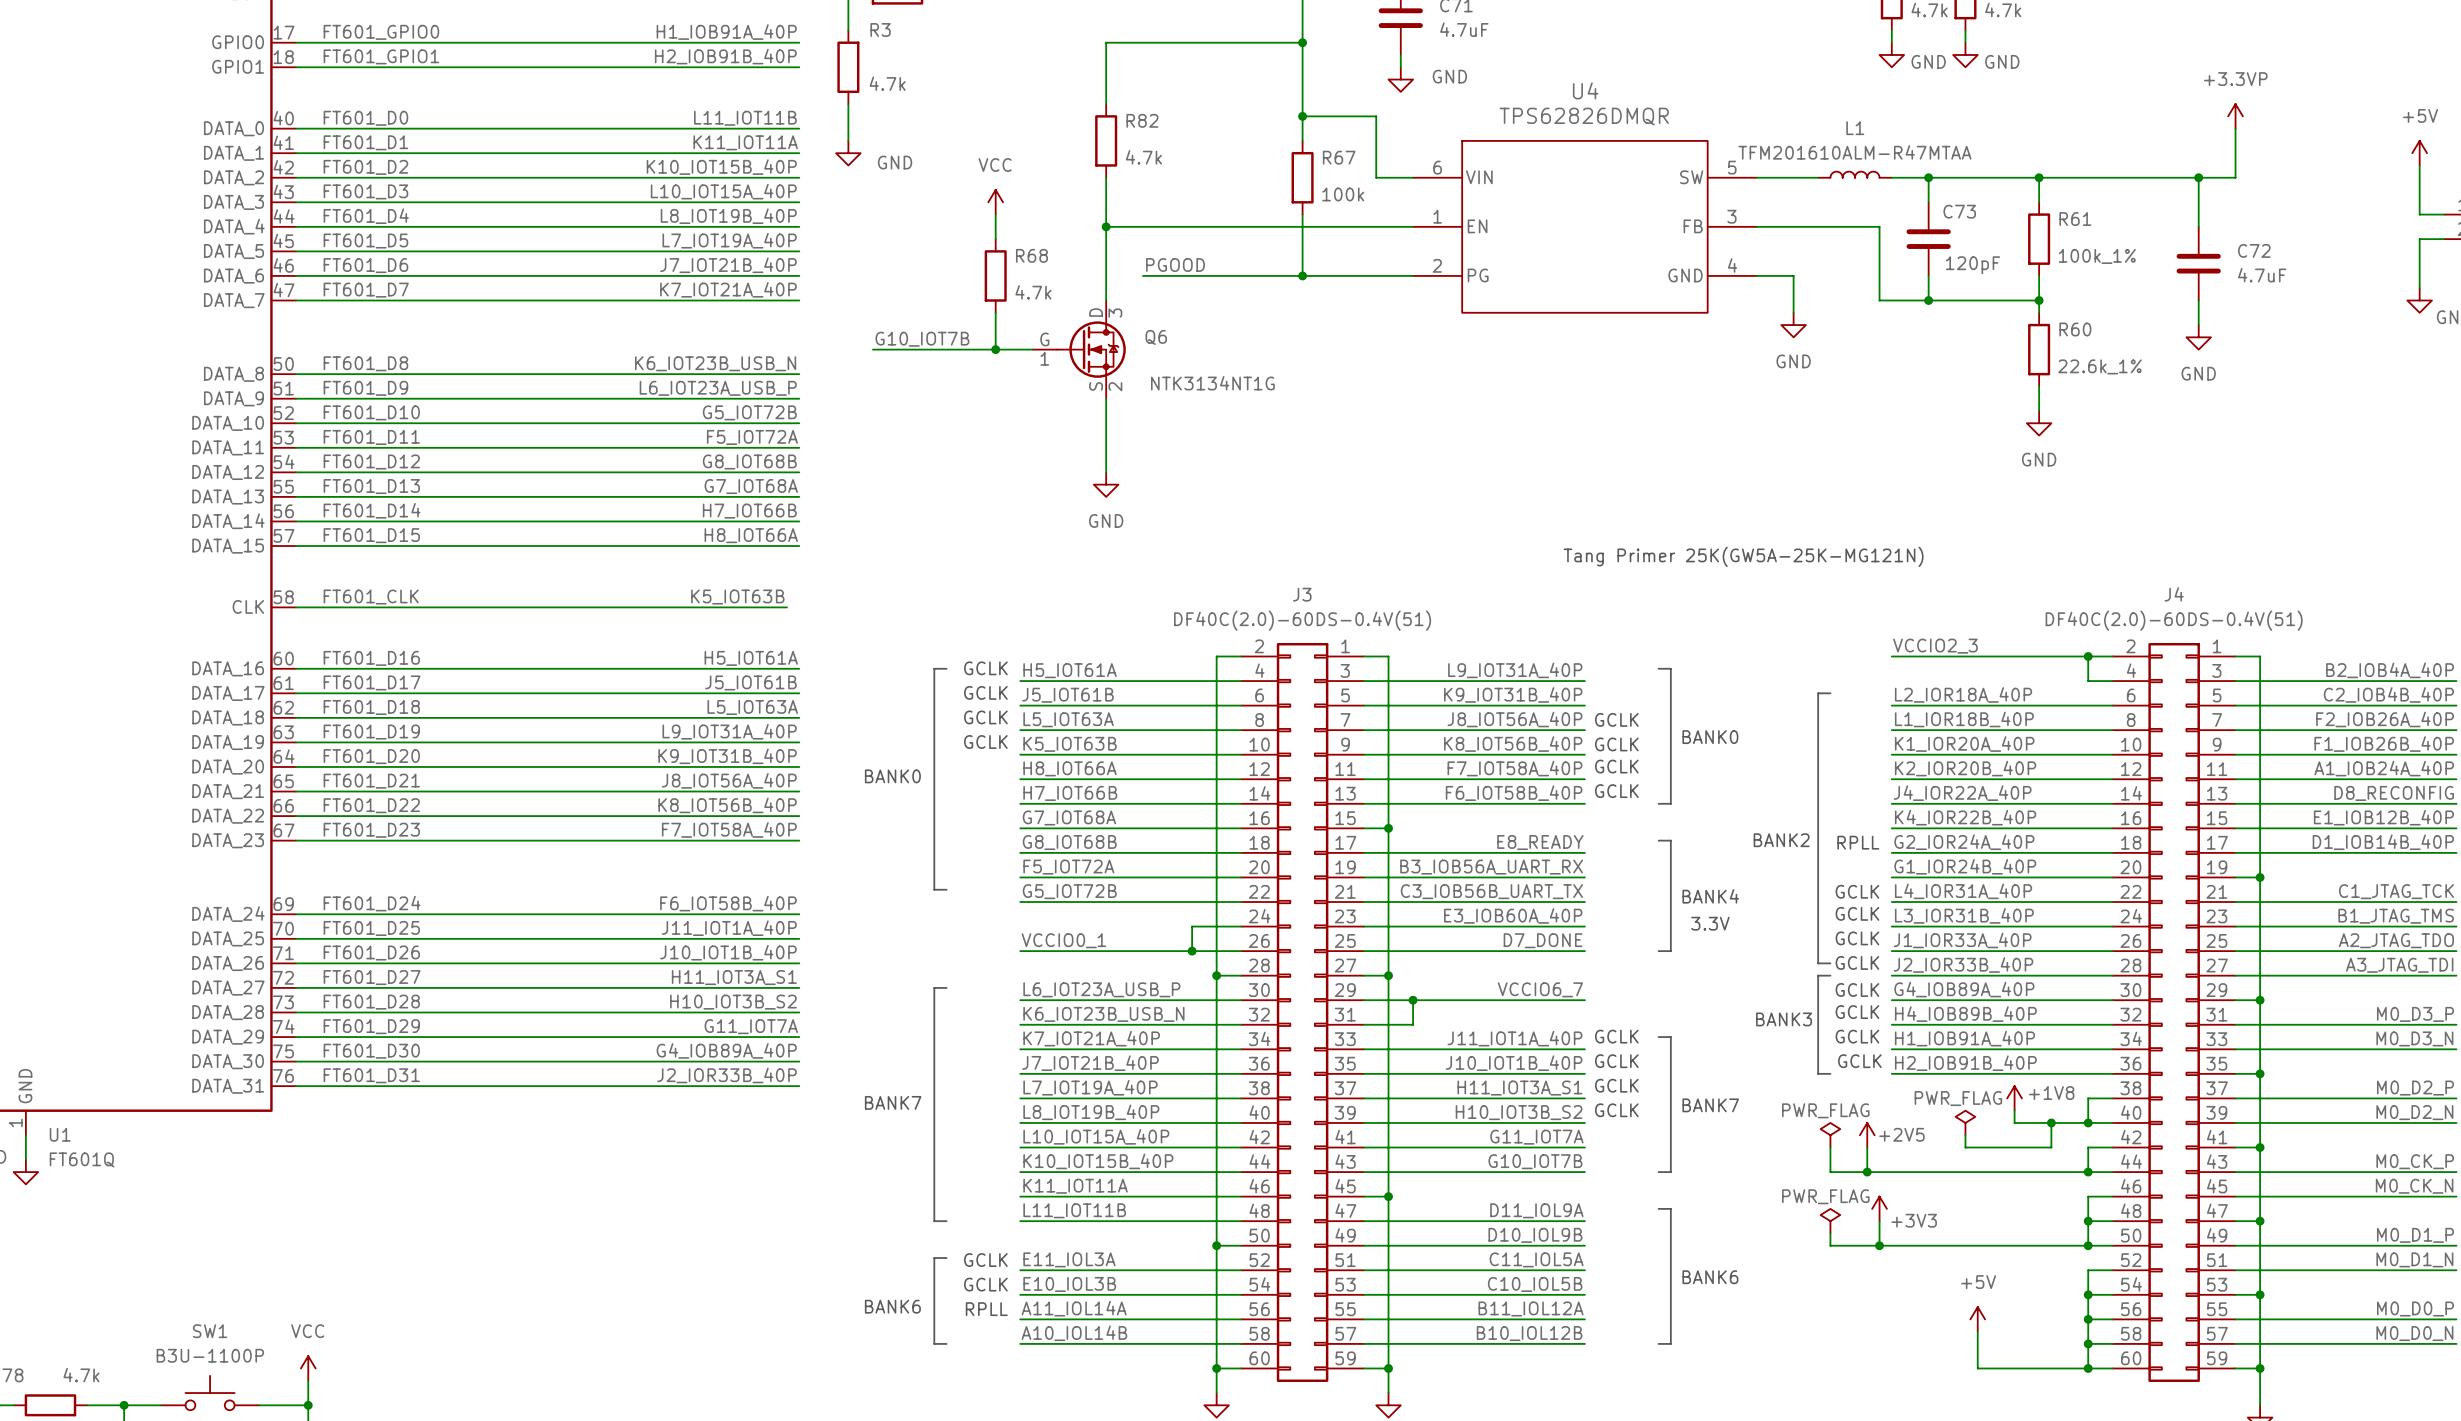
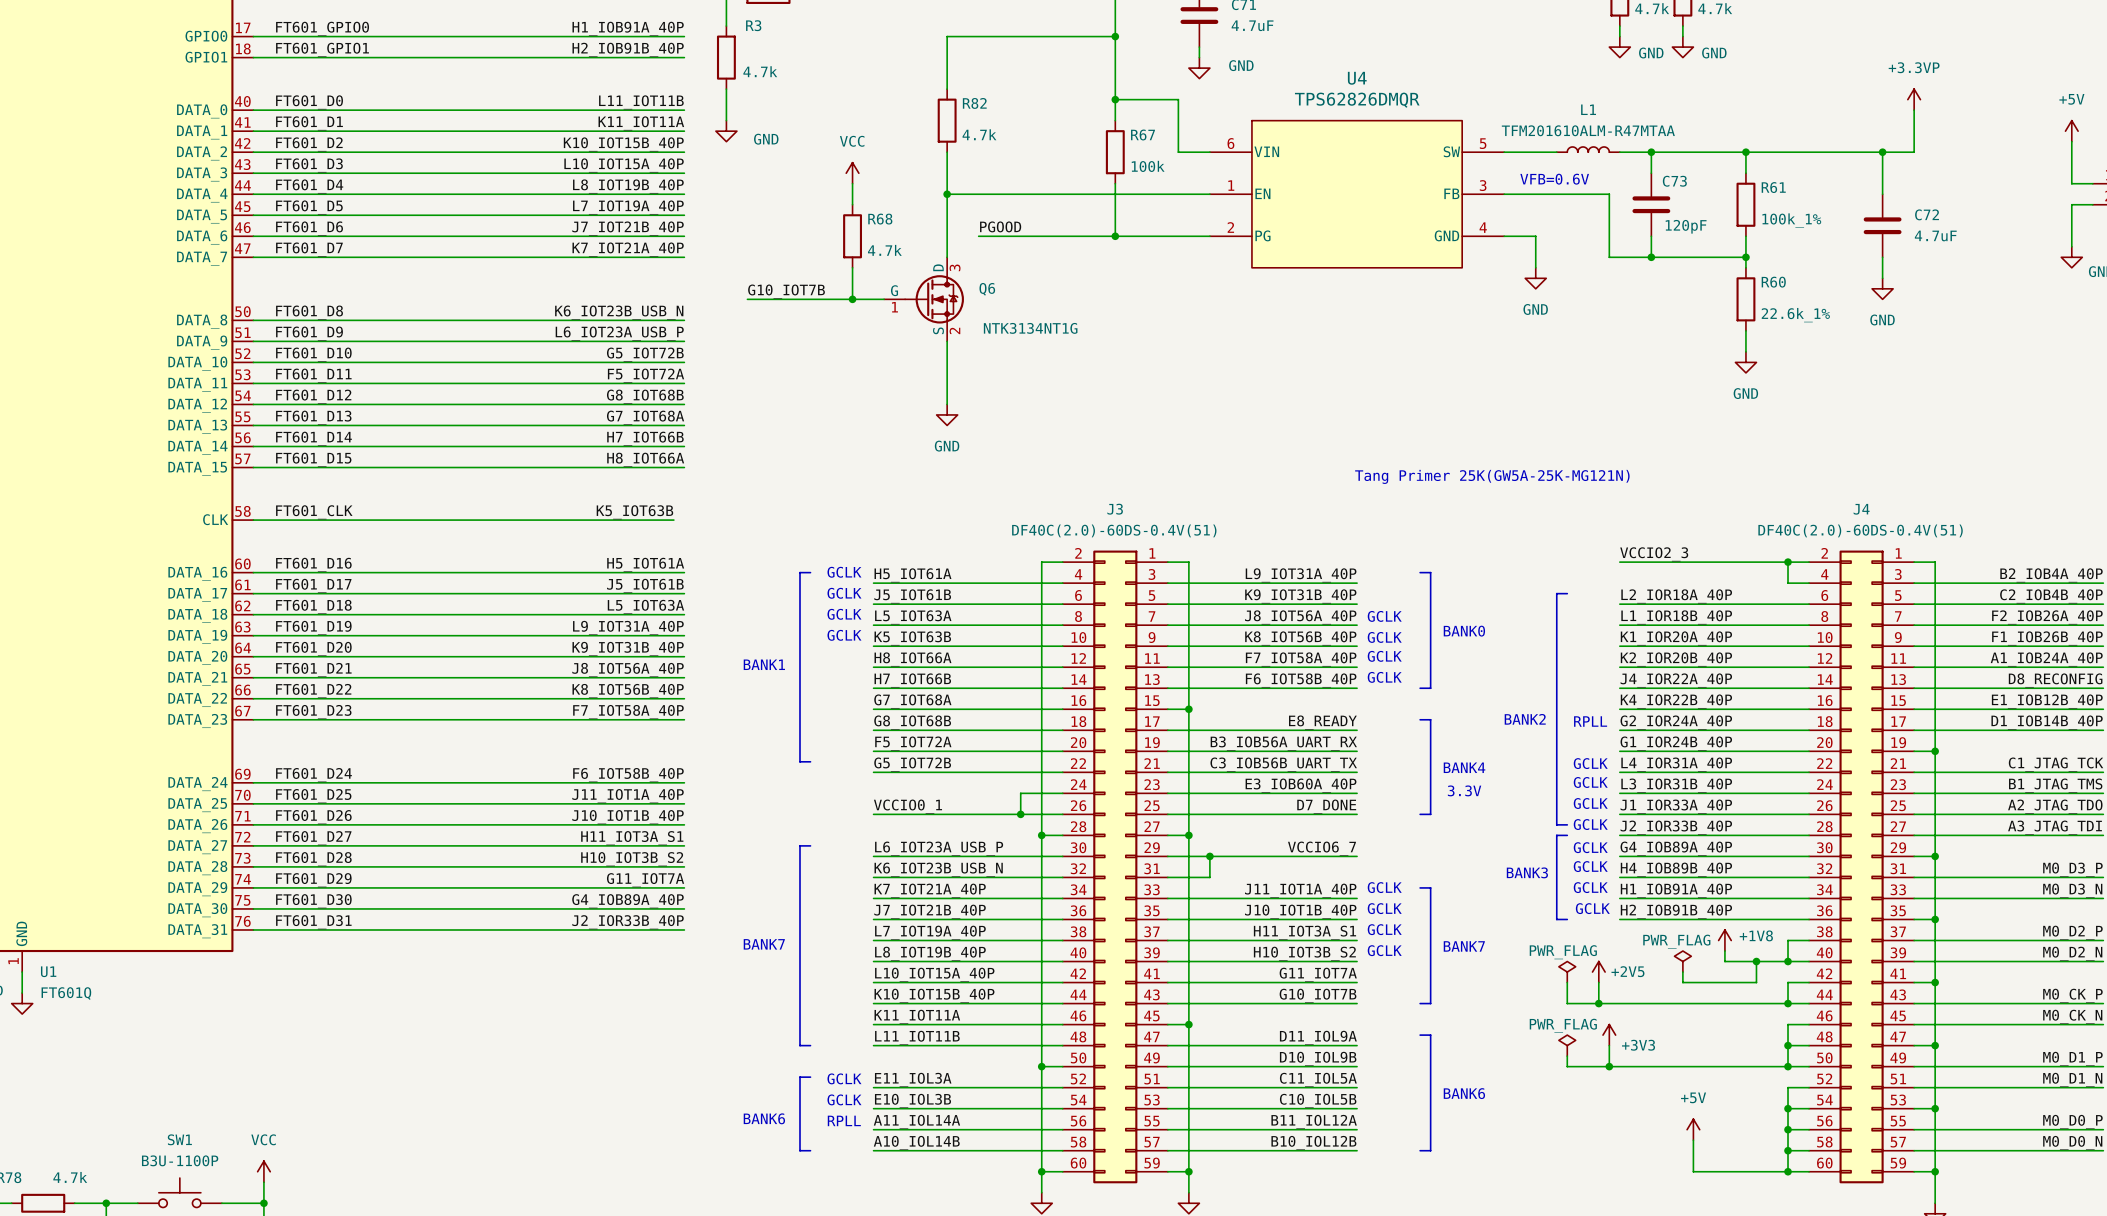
text: none -> VFB=0.6V (1554, 179)
text: BANK0 (892, 776) -> BANK1 (764, 664)

